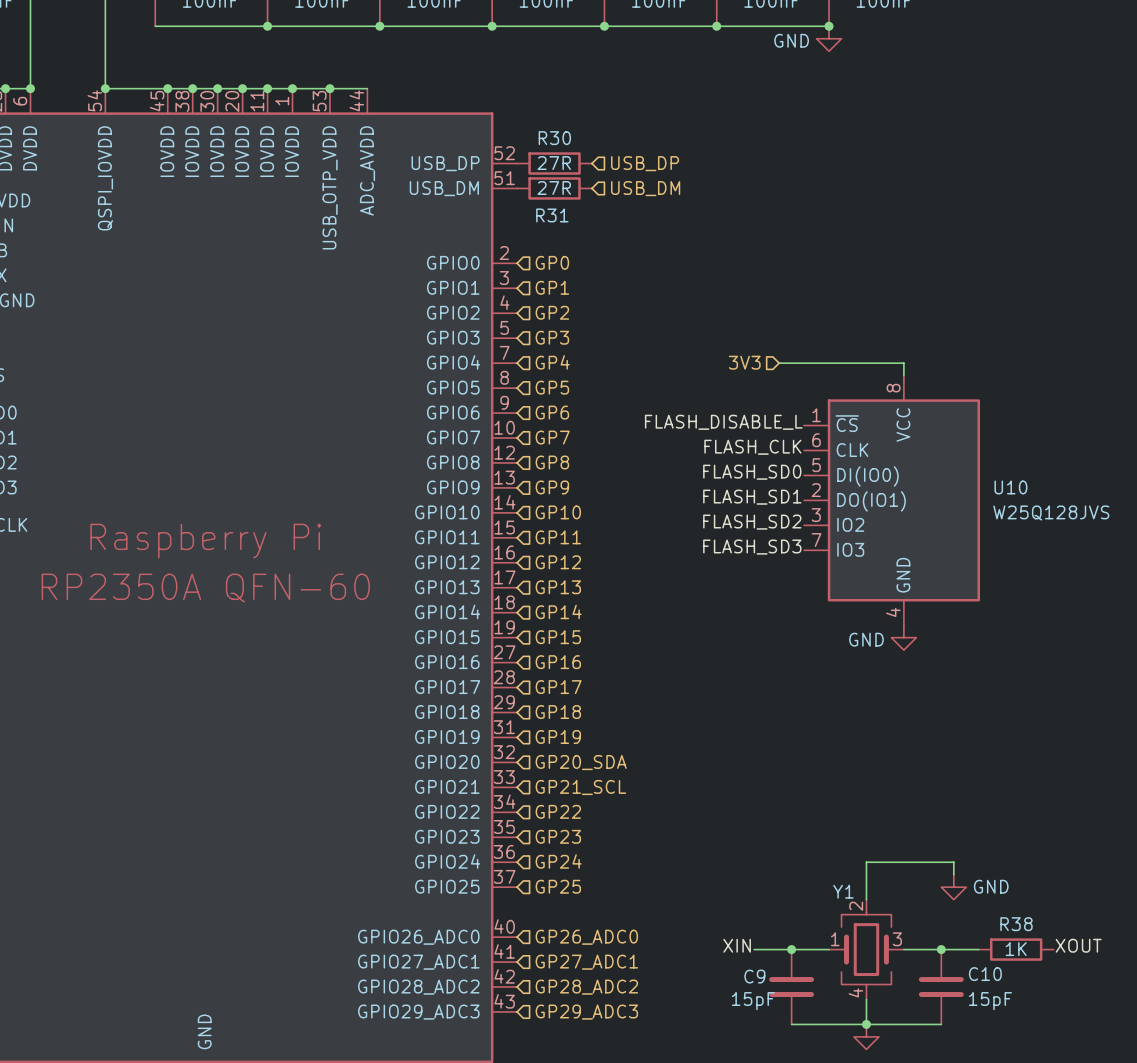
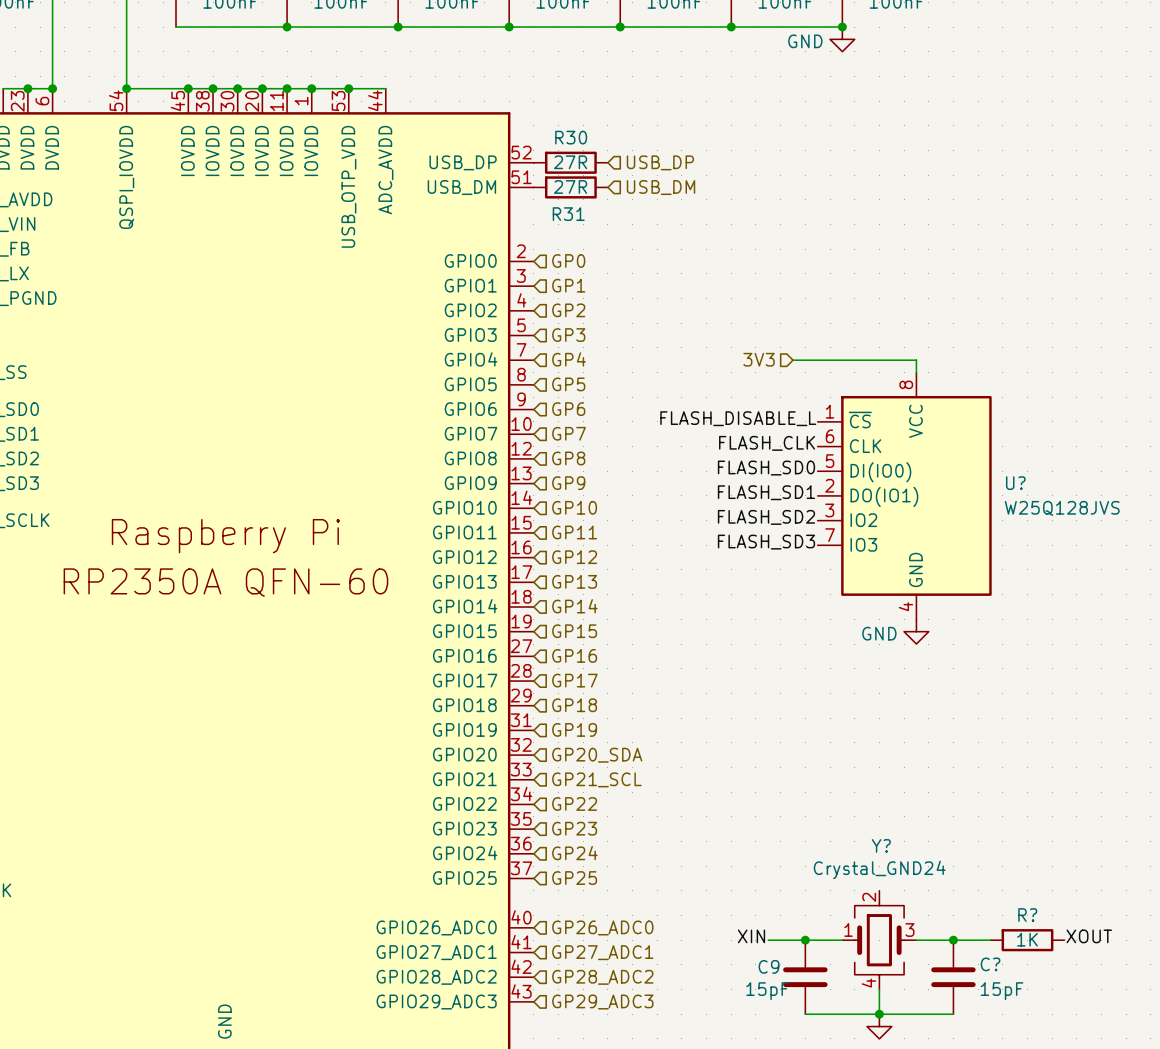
U10 name: U10 (1010, 487) -> U? (1015, 483)
wire: (953, 874) (953, 862) (866, 862) (866, 899) -> none
Y1 value: none -> Crystal_GND24 (879, 869)
power symbol: GND (953, 887) -> none
Y1 name: Y1 (843, 891) -> Y? (881, 845)
R38 name: R38 (1016, 924) -> R? (1027, 915)
C10 name: C10 (985, 974) -> C? (990, 964)

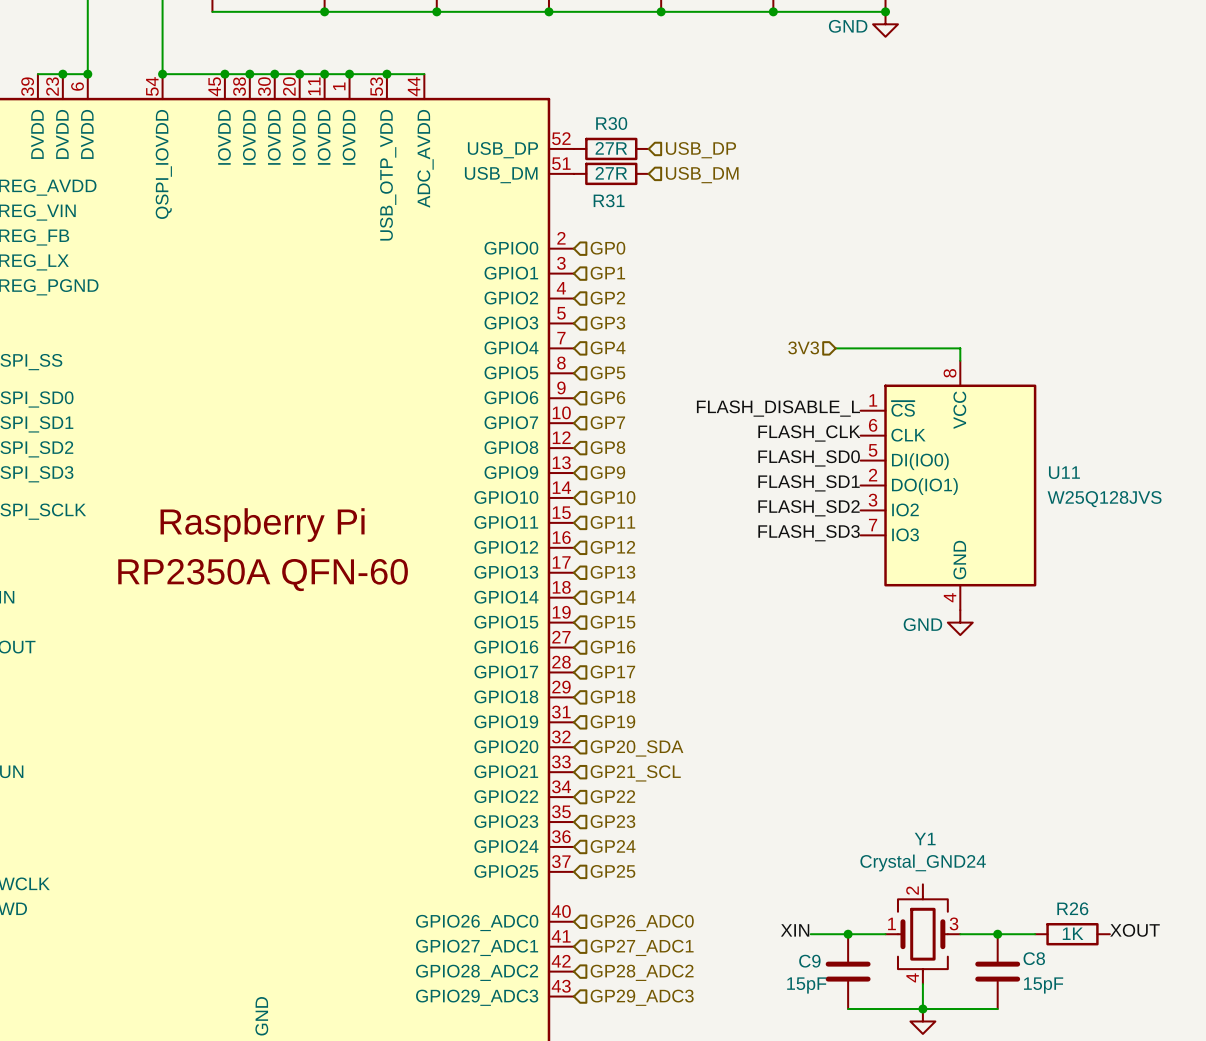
U? name: U? (1015, 483) -> U11 (1064, 472)
Y? name: Y? (881, 845) -> Y1 (925, 839)
R? name: R? (1027, 915) -> R26 (1072, 908)
C? name: C? (990, 964) -> C8 (1034, 958)

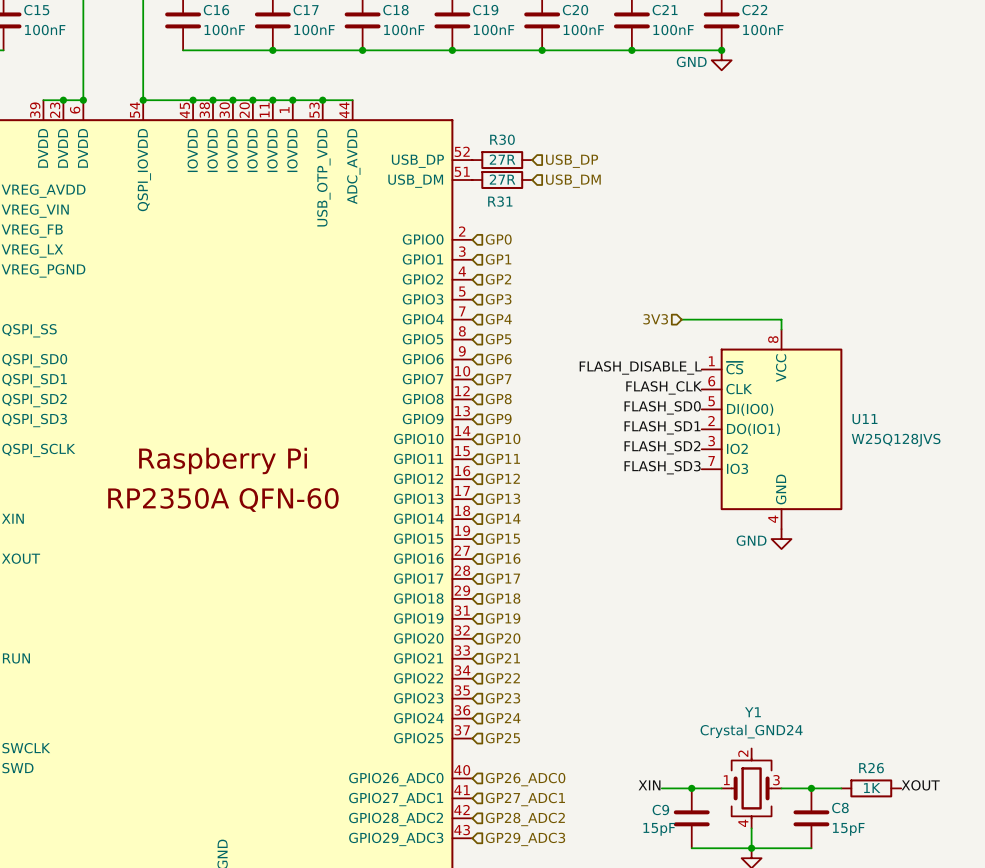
hierarchical label: GP20_SDA (637, 748) -> GP20 (503, 638)
hierarchical label: GP21_SCL (635, 773) -> GP21 (502, 658)

